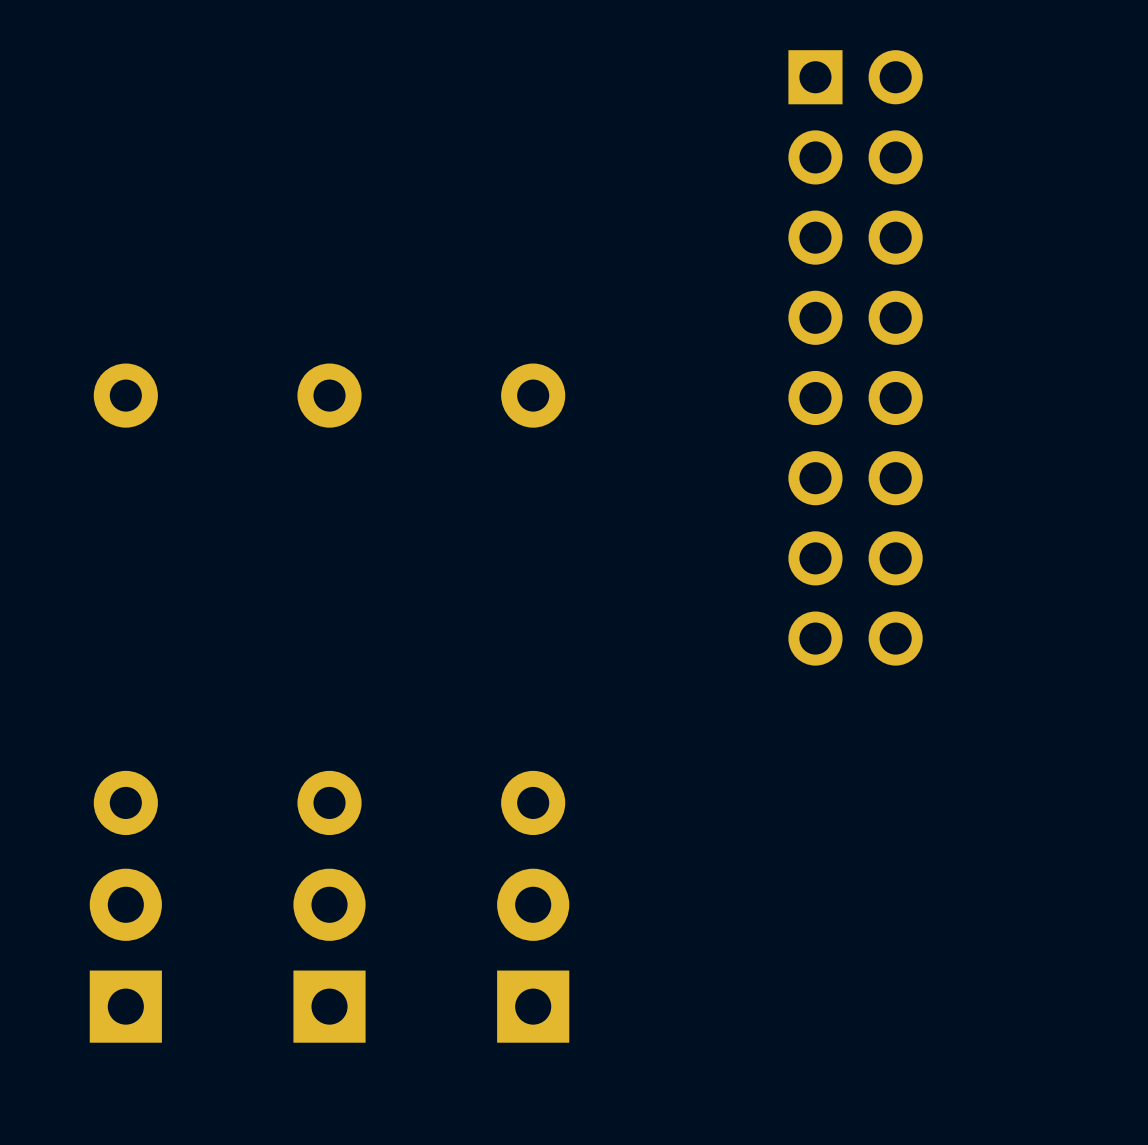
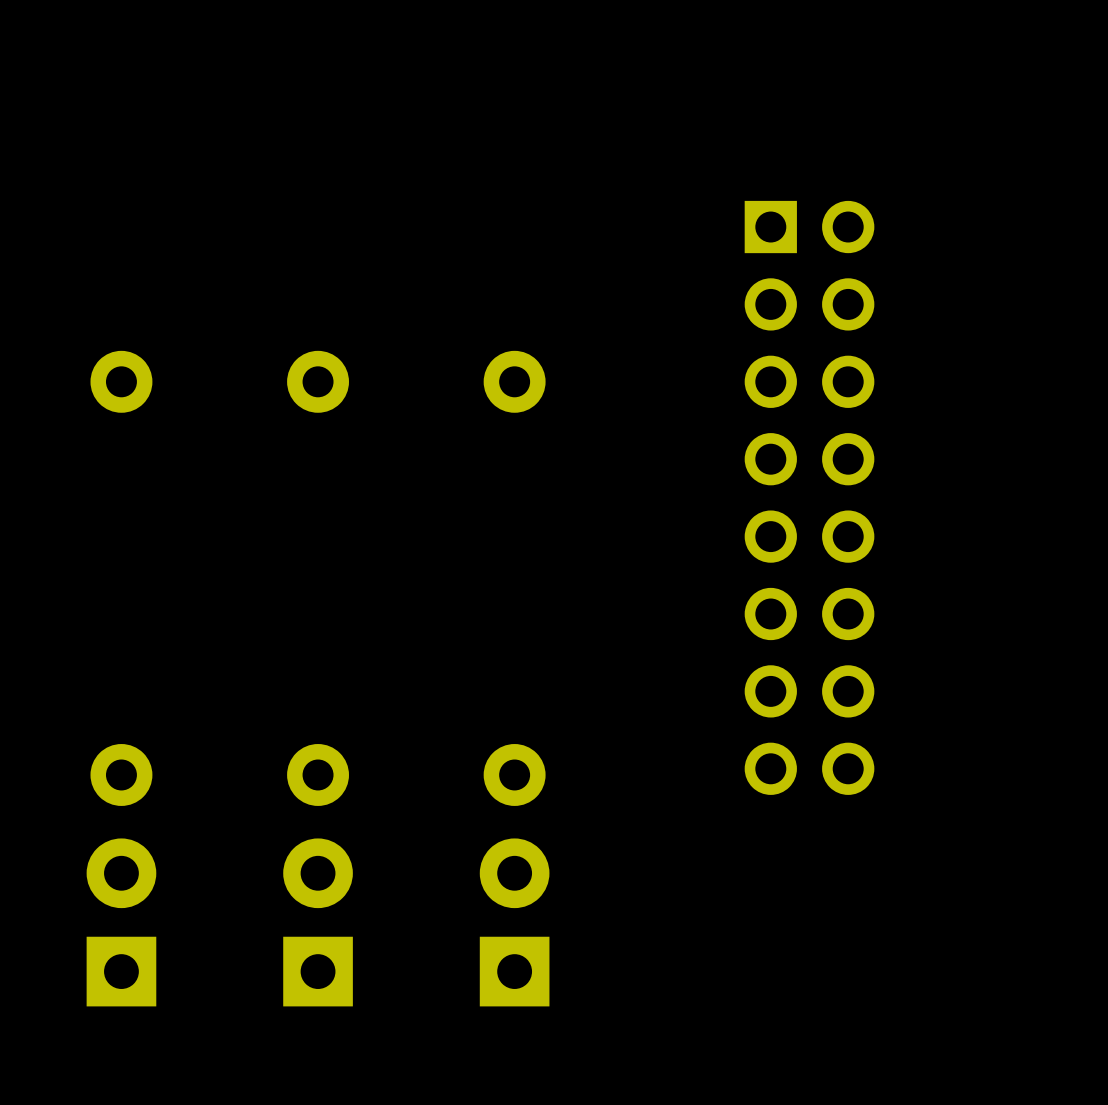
part position: (855, 357) -> (809, 497)

